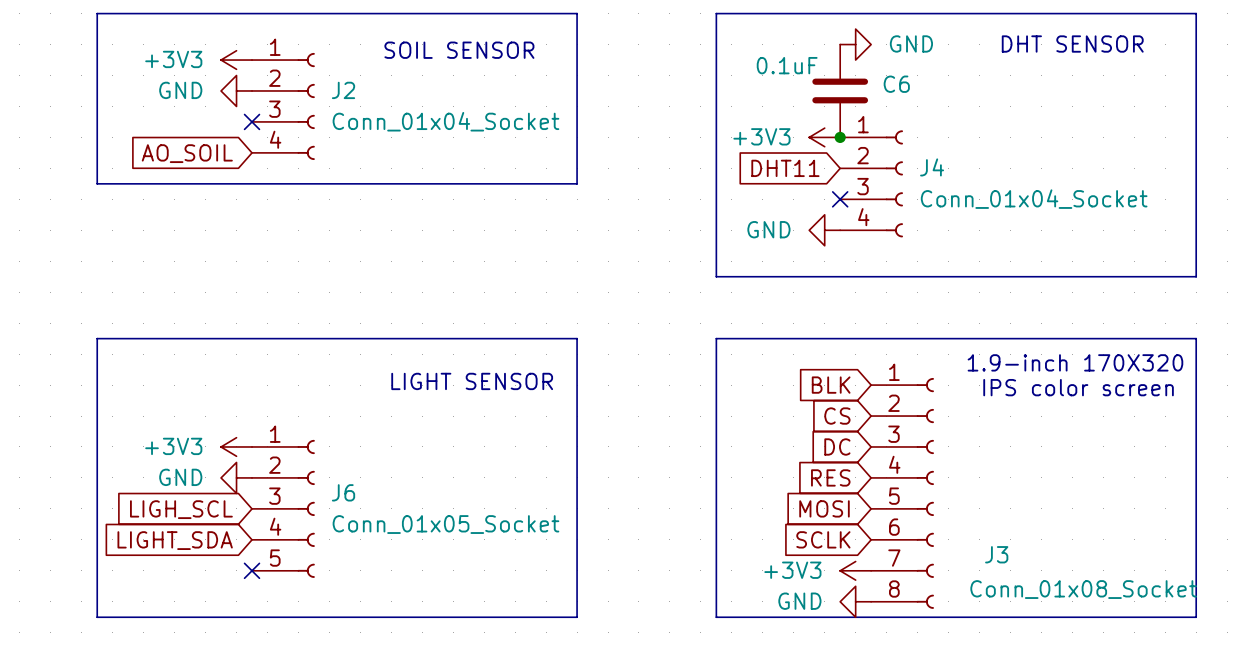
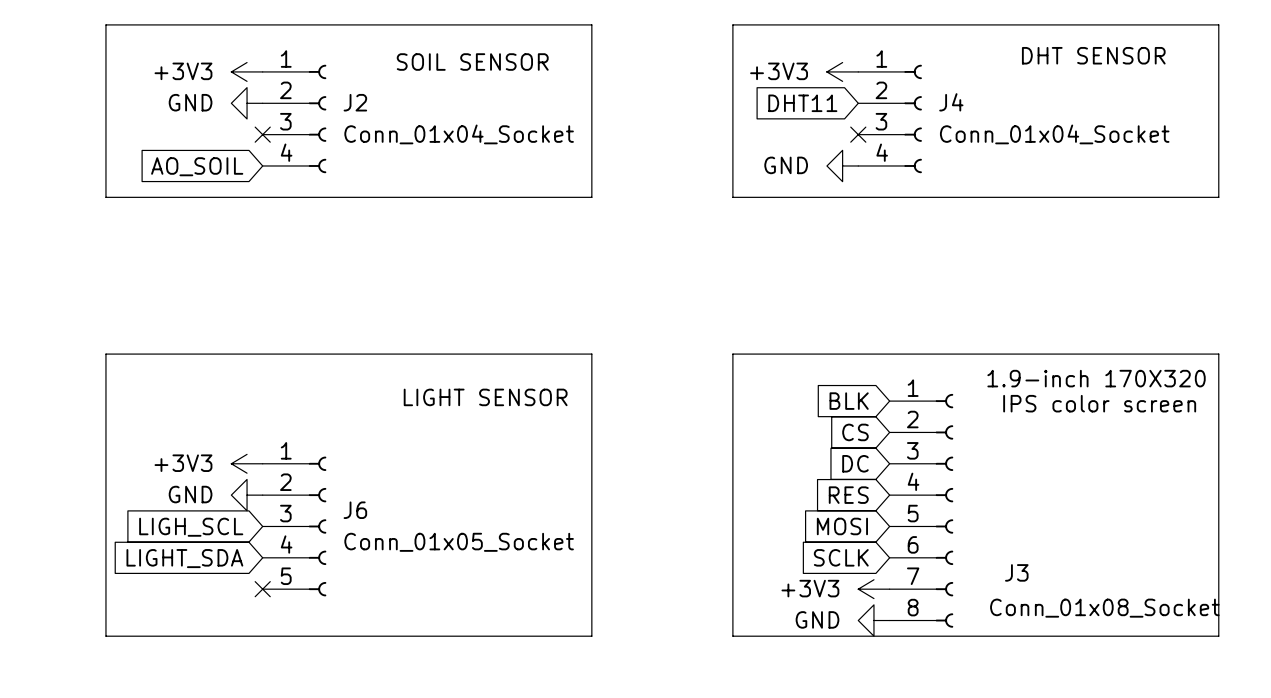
power symbol: GND (855, 44) -> none
C6: 0.1uF (840, 90) -> none
no-connect mark: none -> (858, 134)
power symbol position: +3V3 (824, 137) -> +3V3 (842, 71)
junction: (840, 137) -> none
power symbol: none -> GND (842, 165)
global label position: DHT11 (785, 168) -> DHT11 (802, 103)
line: (716, 183) (716, 276) (1196, 276) (1196, 183) -> (732, 197) (1218, 197)
J4 position: (871, 183) -> (890, 118)
no-connect mark: (840, 199) -> none
power symbol: GND (824, 230) -> none

